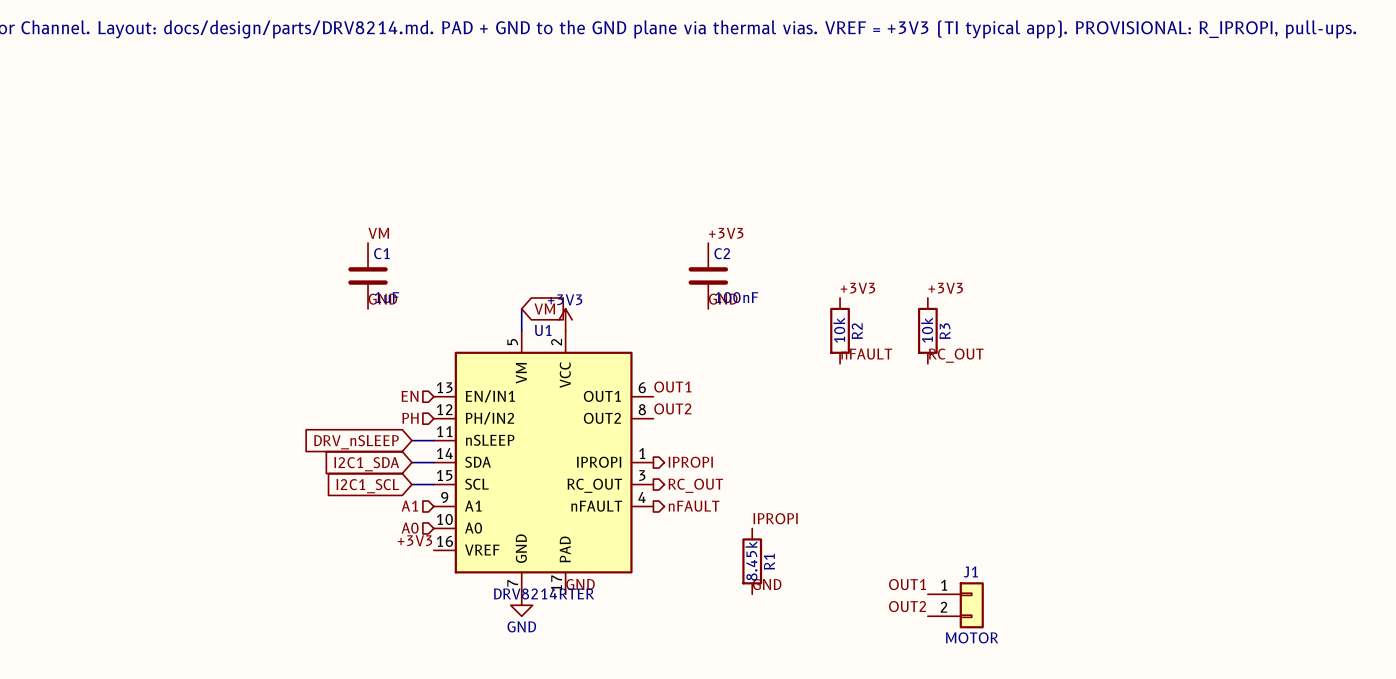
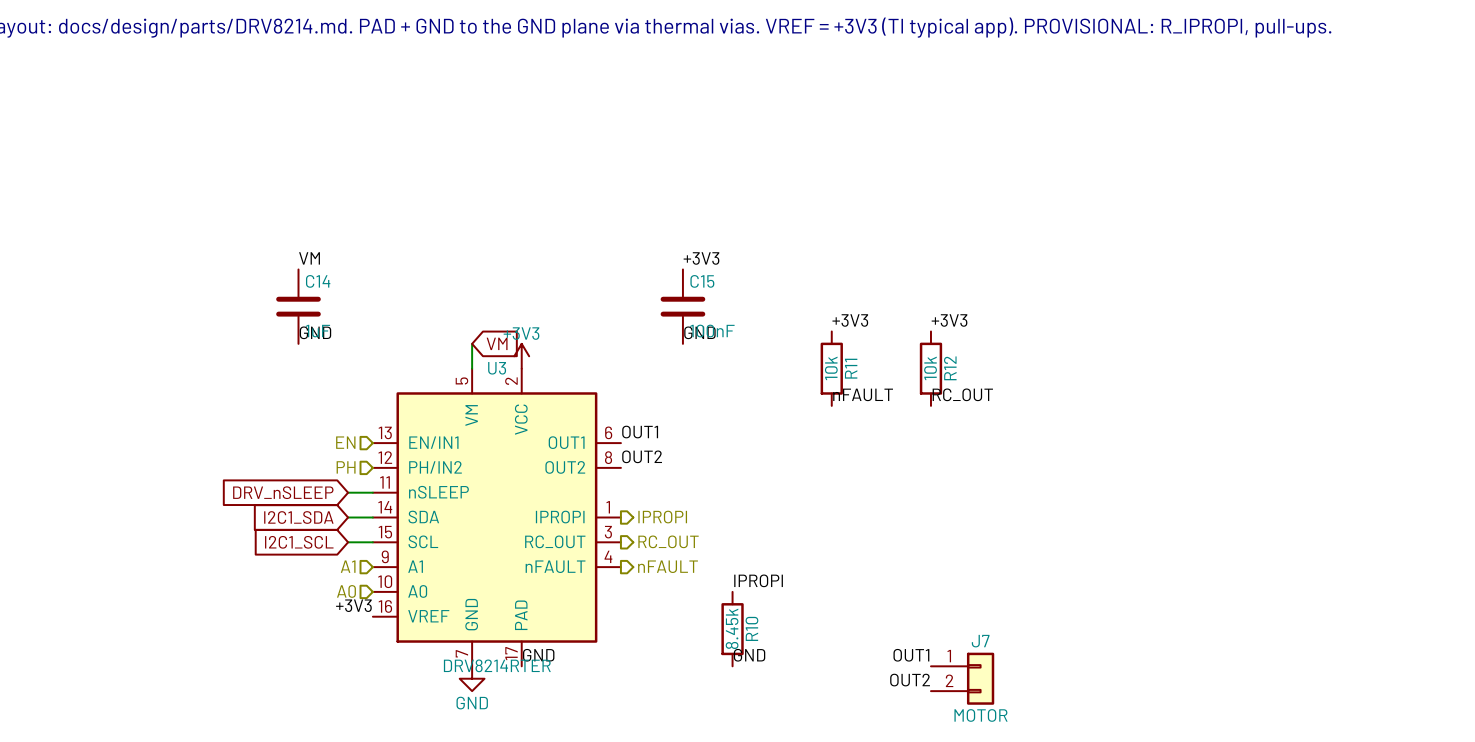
C1 name: C1 (381, 253) -> C14 (318, 281)
C2 name: C2 (722, 253) -> C15 (702, 281)
U1 name: U1 (543, 330) -> U3 (497, 368)
R2 name: R2 (857, 331) -> R11 (851, 368)
R3 name: R3 (945, 331) -> R12 (950, 368)
R1 name: R1 (769, 561) -> R10 (751, 628)
J1 name: J1 (970, 572) -> J7 (980, 641)

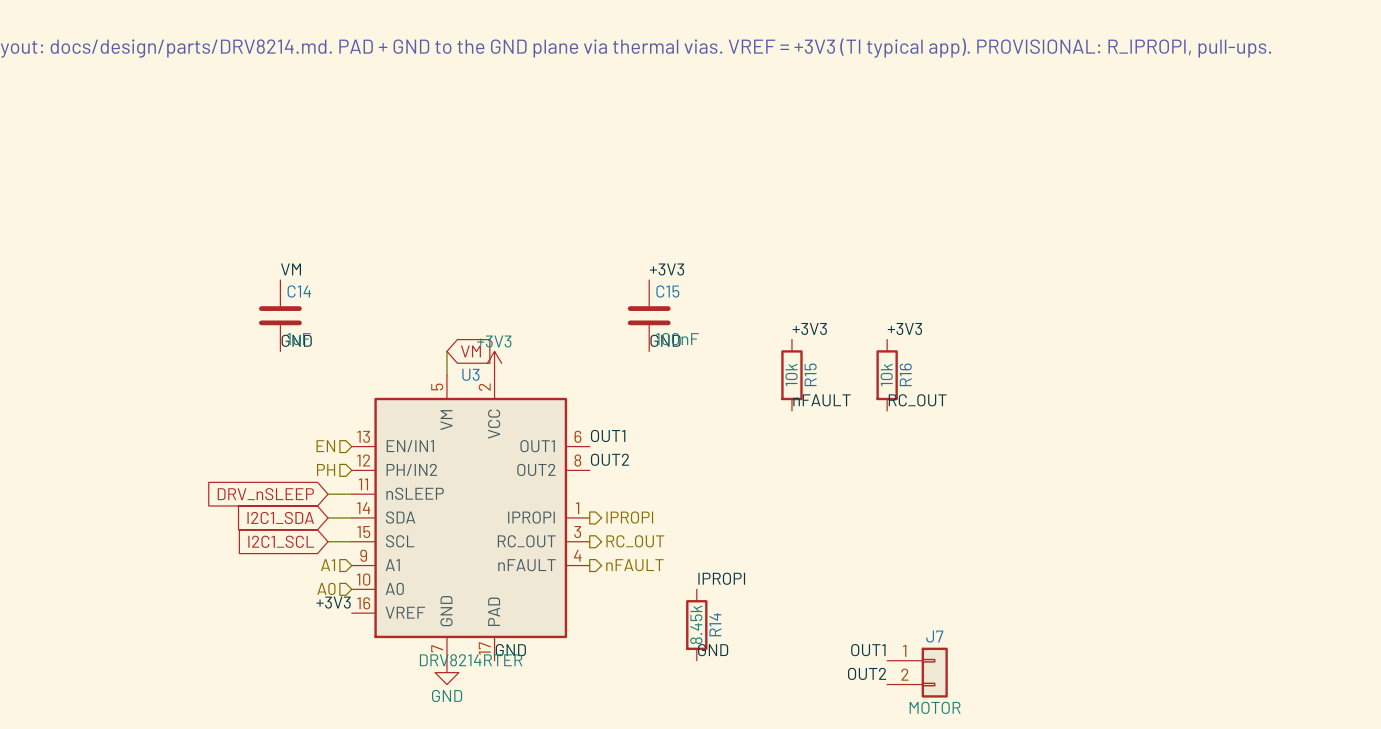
R11 name: R11 (851, 368) -> R15 (810, 374)
R12 name: R12 (950, 368) -> R16 (905, 374)
R10 name: R10 (751, 628) -> R14 (715, 624)

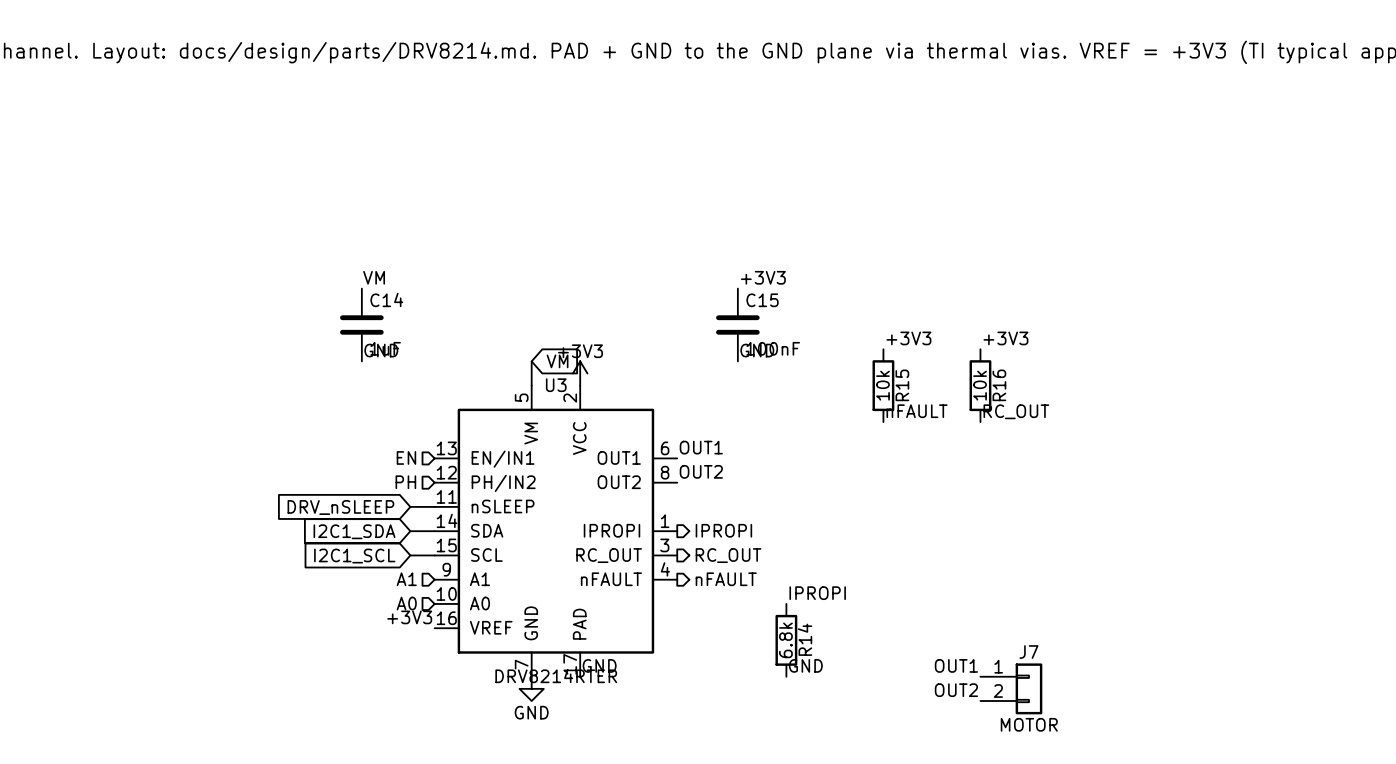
R14 value: 8.45k (696, 624) -> 6.8k (785, 640)

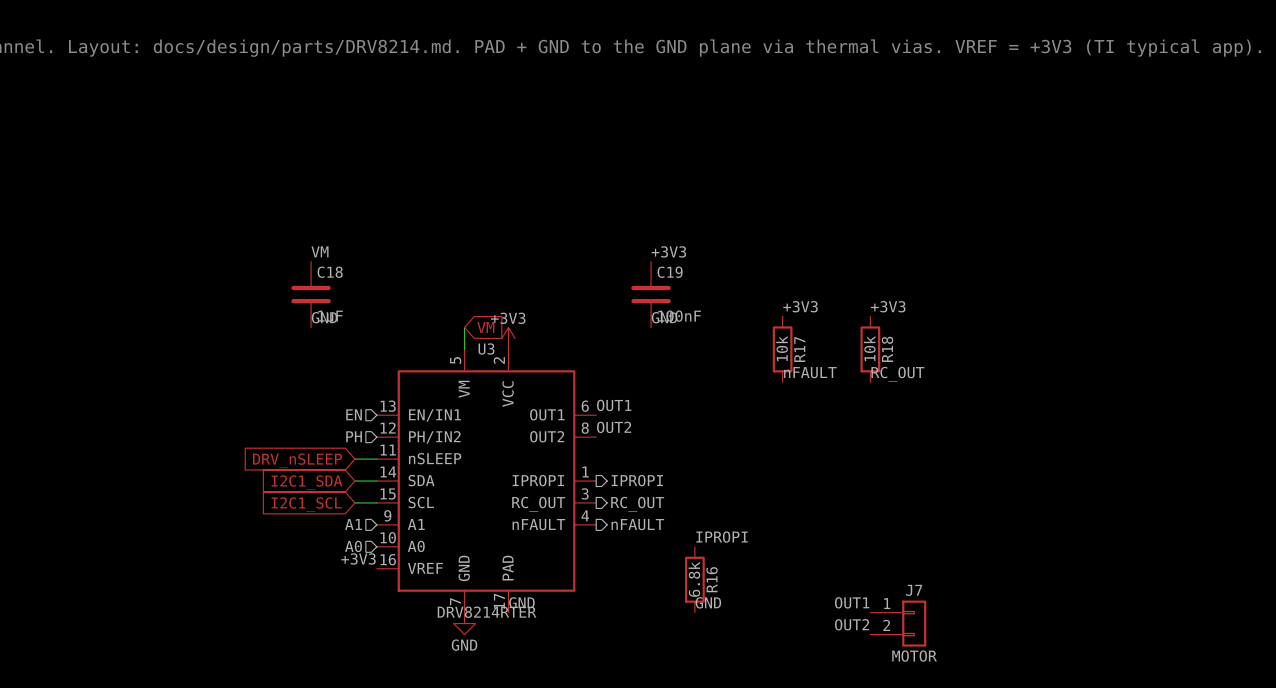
C14 name: C14 (386, 300) -> C18 (330, 272)
C15 name: C15 (762, 300) -> C19 (670, 272)
R15 name: R15 (902, 385) -> R17 (799, 349)
R16 name: R16 (999, 385) -> R18 (887, 349)
R14 name: R14 (805, 639) -> R16 (712, 579)

